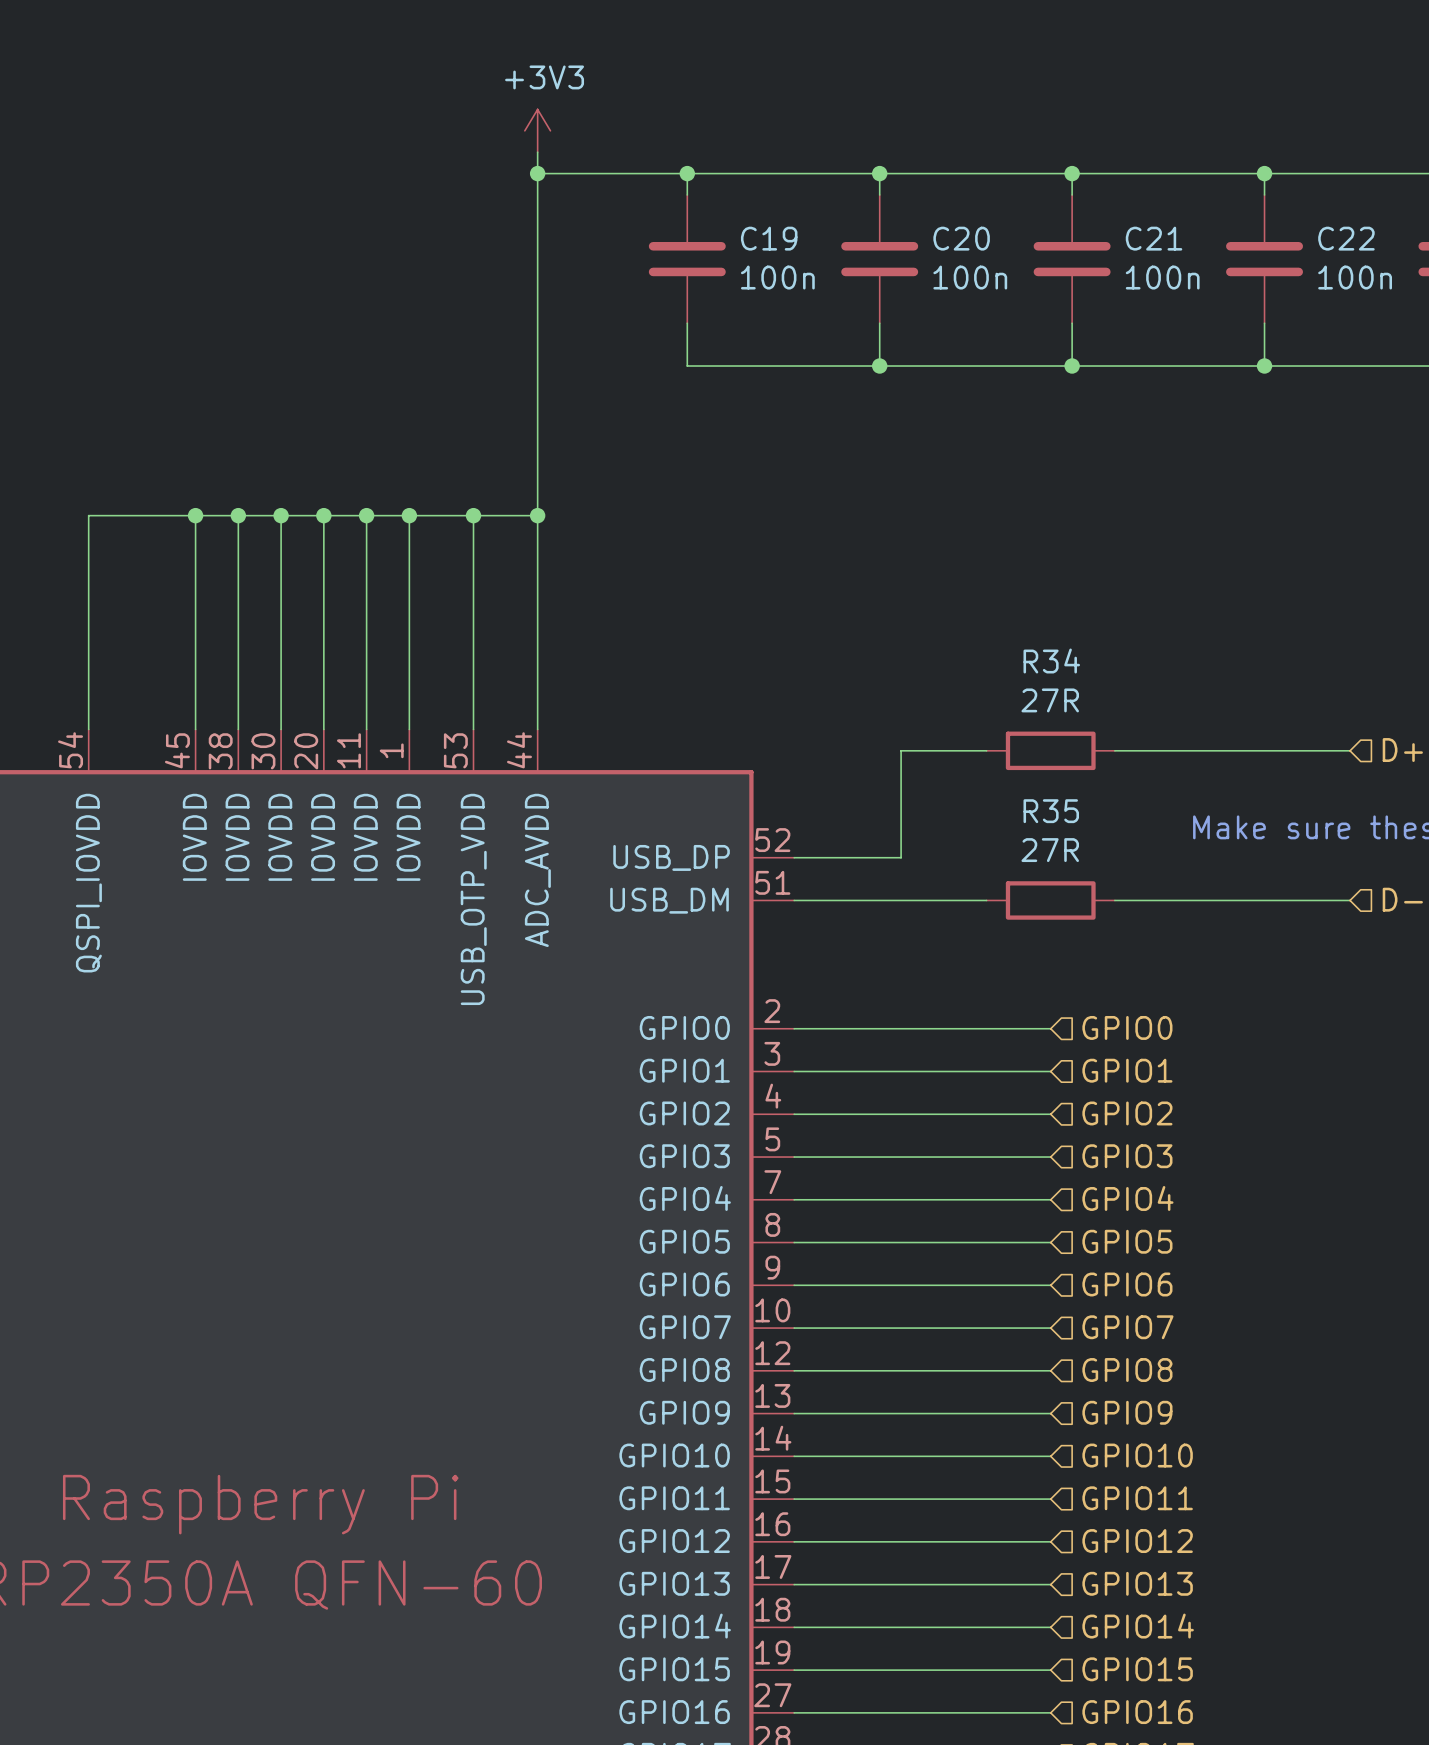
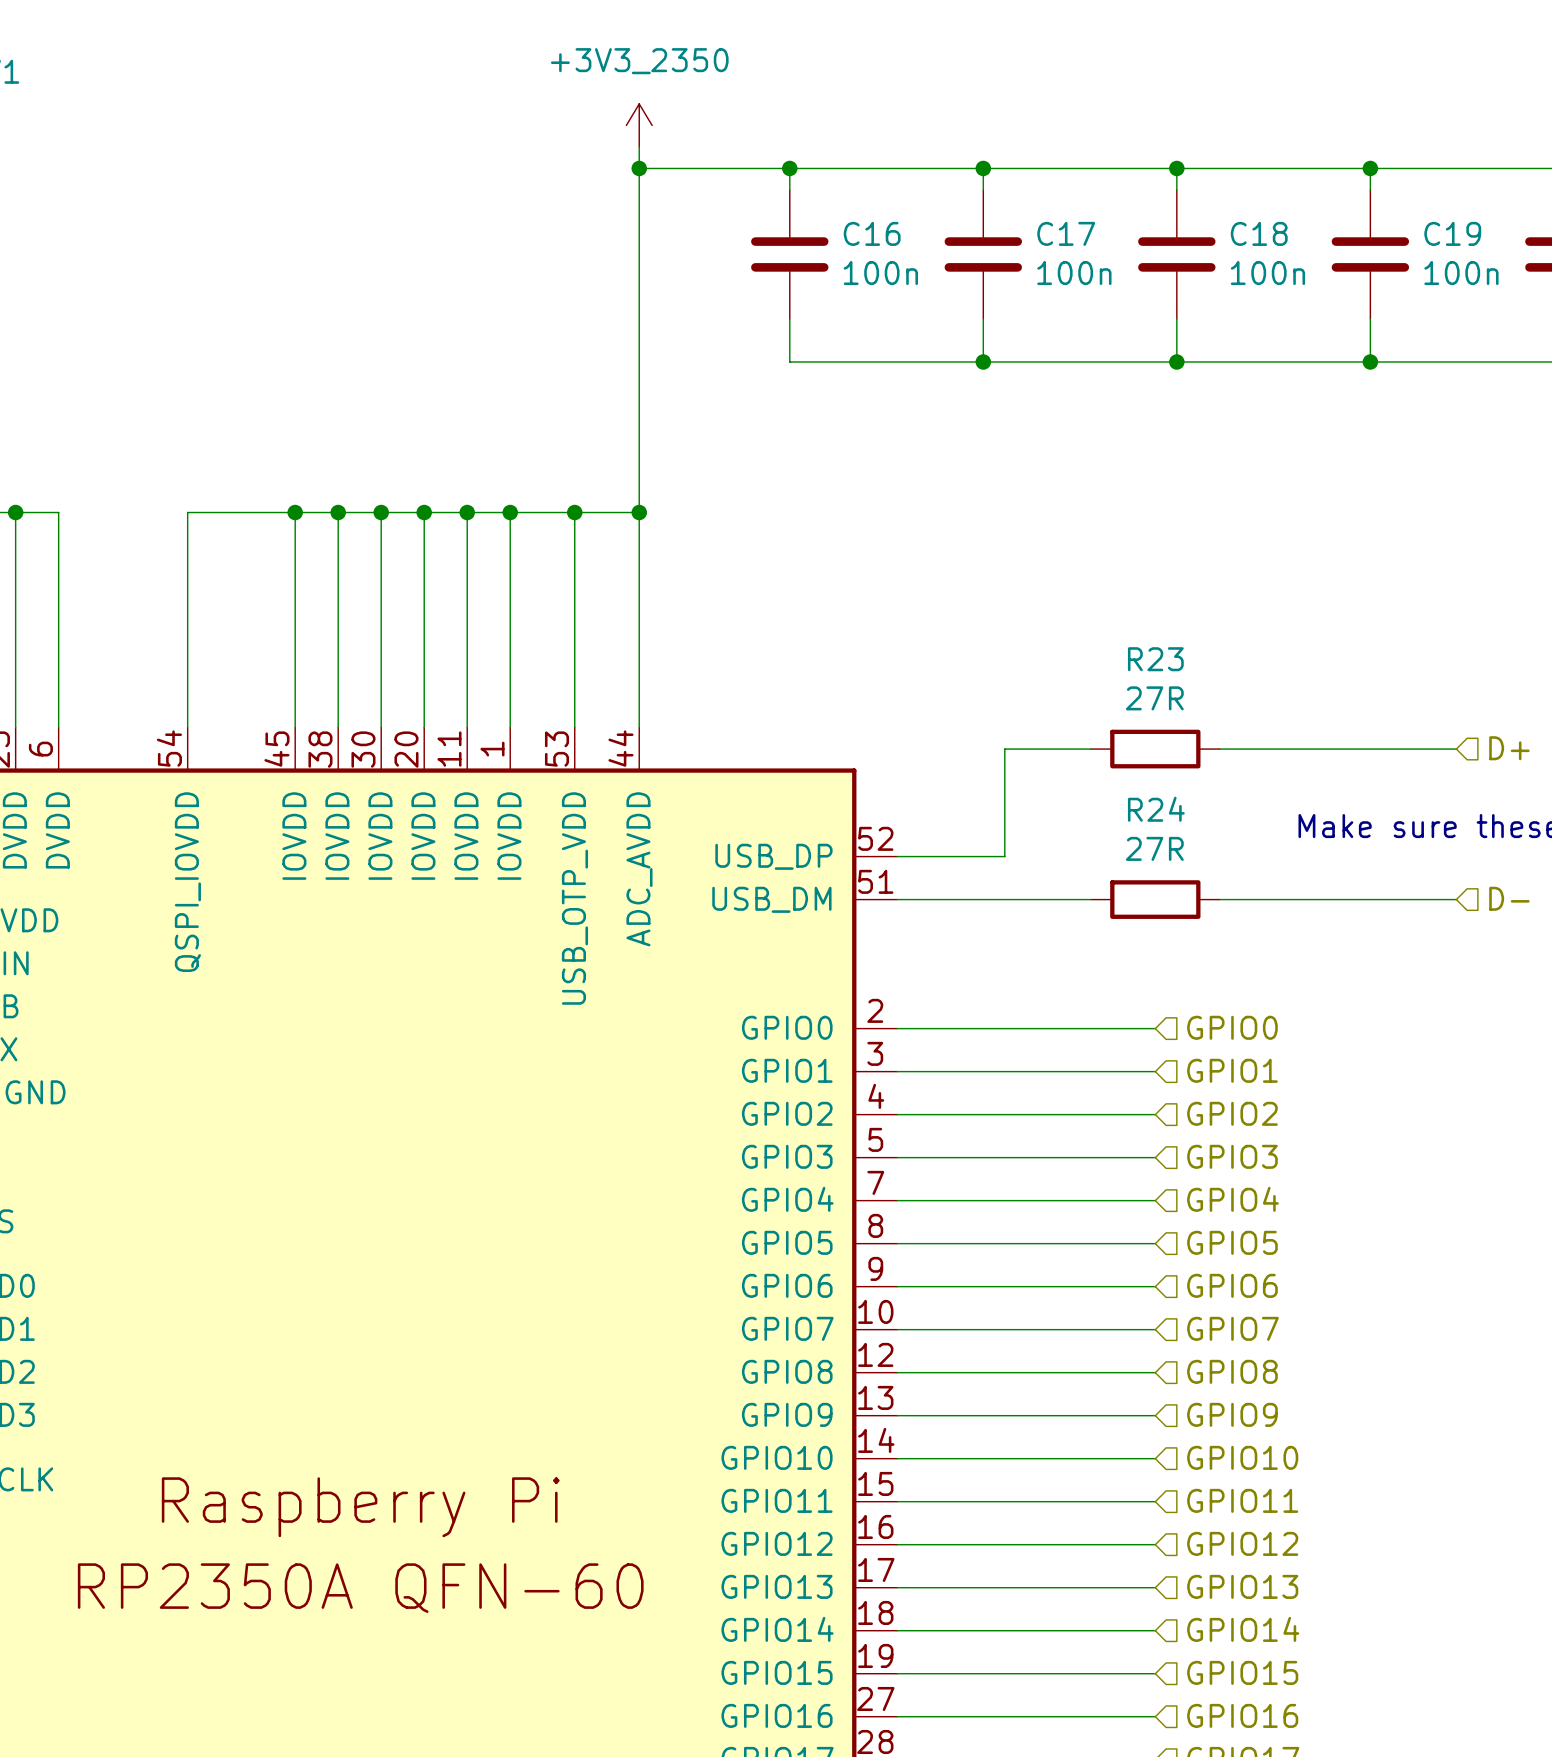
power symbol: +3V3 (537, 130) -> +3V3_2350 (639, 125)
C19 name: C19 (769, 238) -> C16 (872, 233)
C20 name: C20 (961, 238) -> C17 (1066, 233)
C21 name: C21 (1154, 238) -> C18 (1259, 233)
C22 name: C22 (1346, 238) -> C19 (1452, 233)
R34 name: R34 (1051, 661) -> R23 (1155, 659)
R35 name: R35 (1051, 811) -> R24 (1156, 809)

